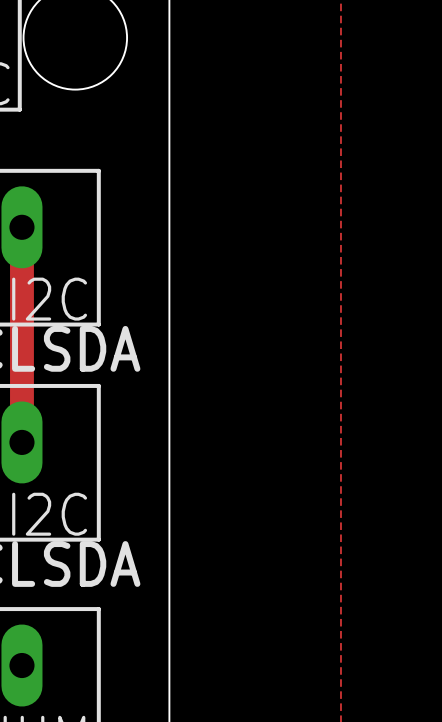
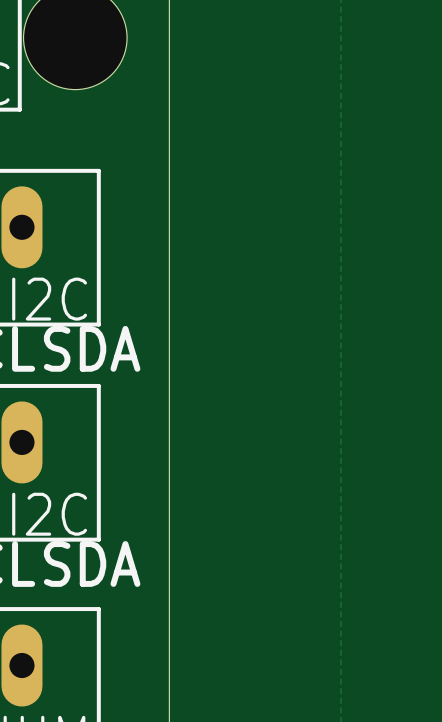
track: (21, 227) (21, 442) -> none

